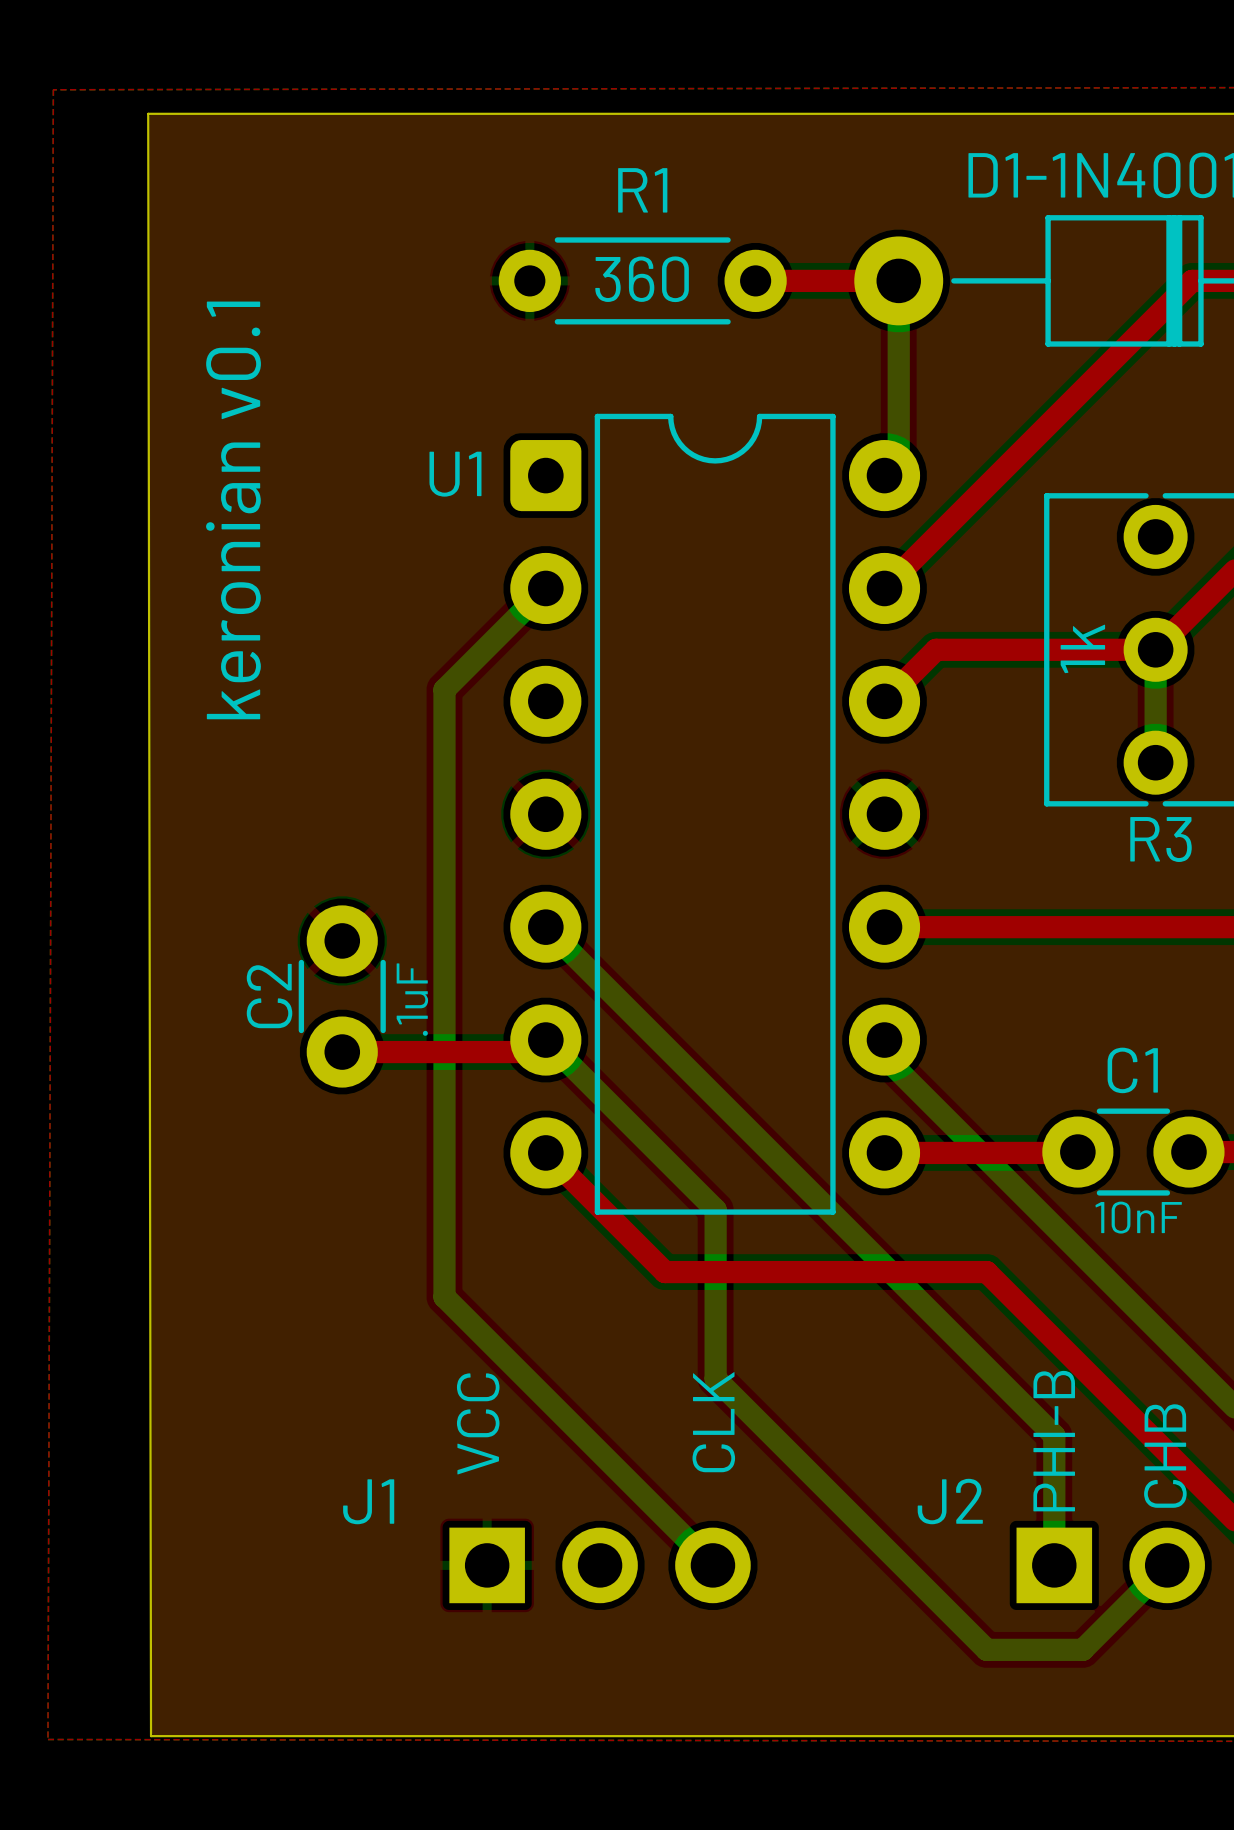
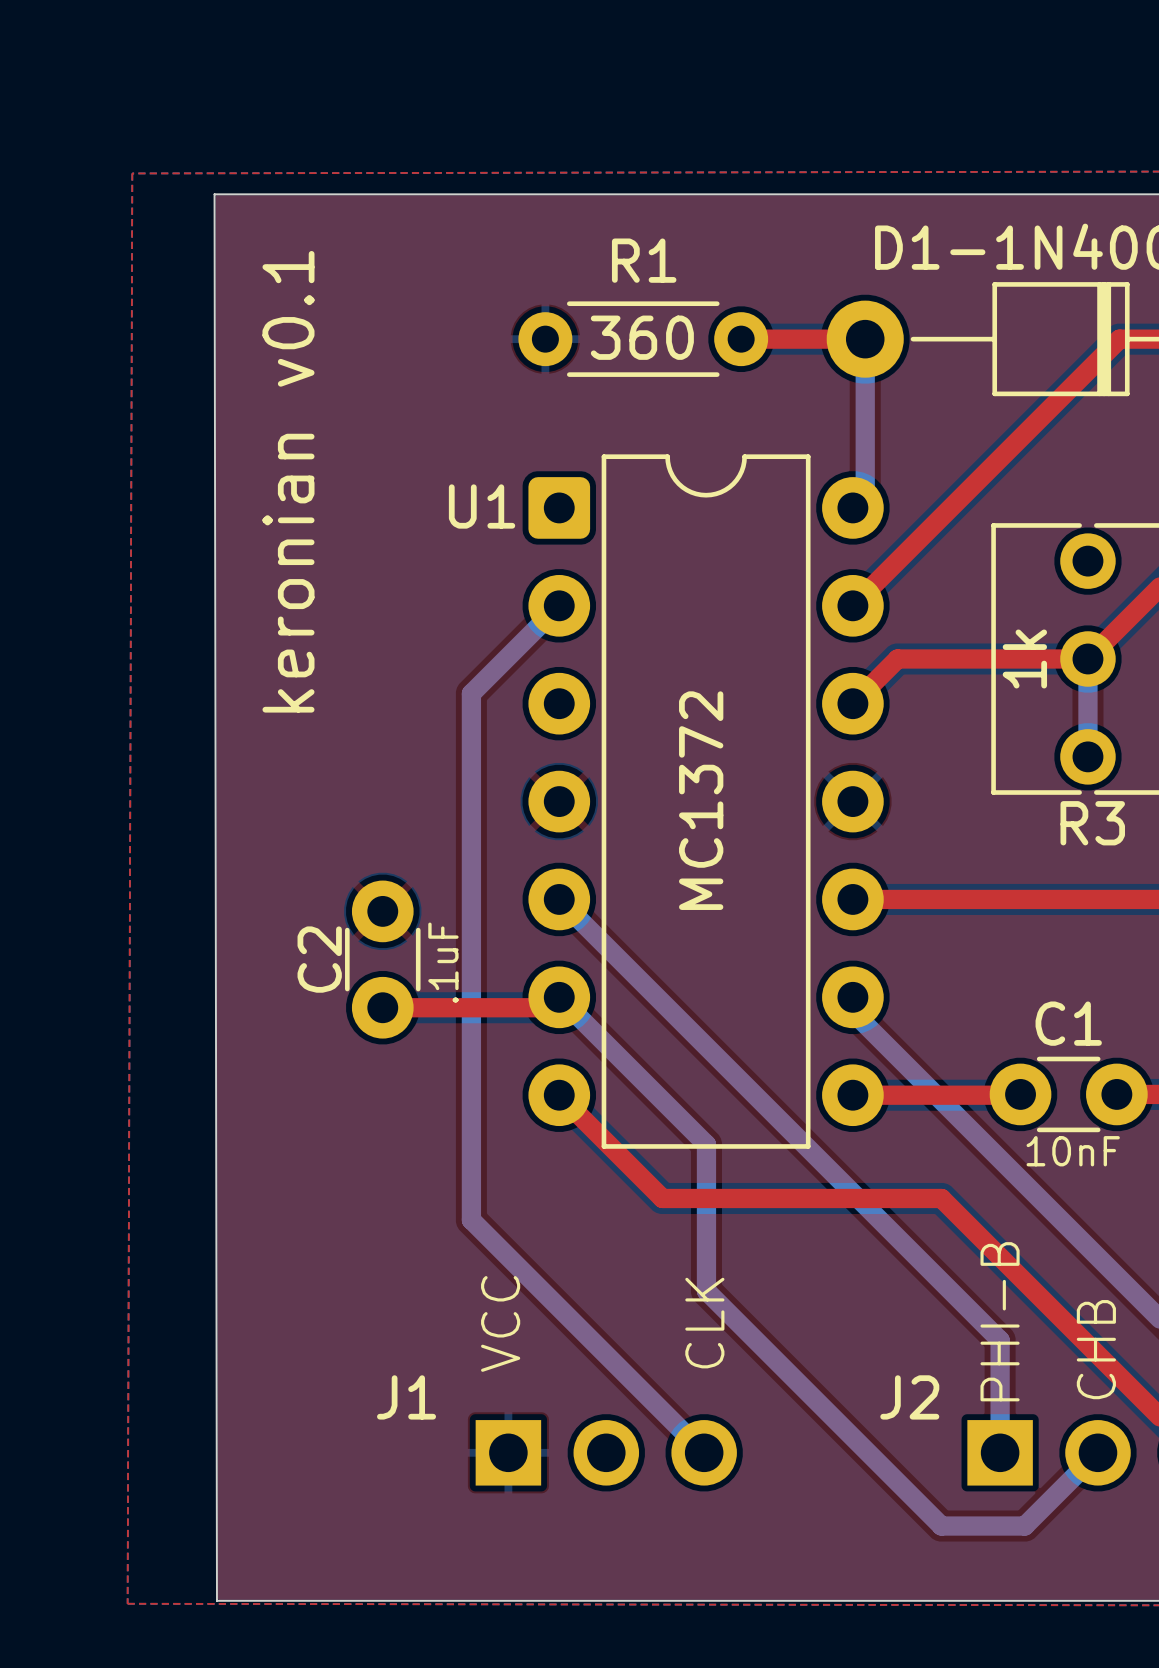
U1 value: none -> MC1372 (701, 800)

